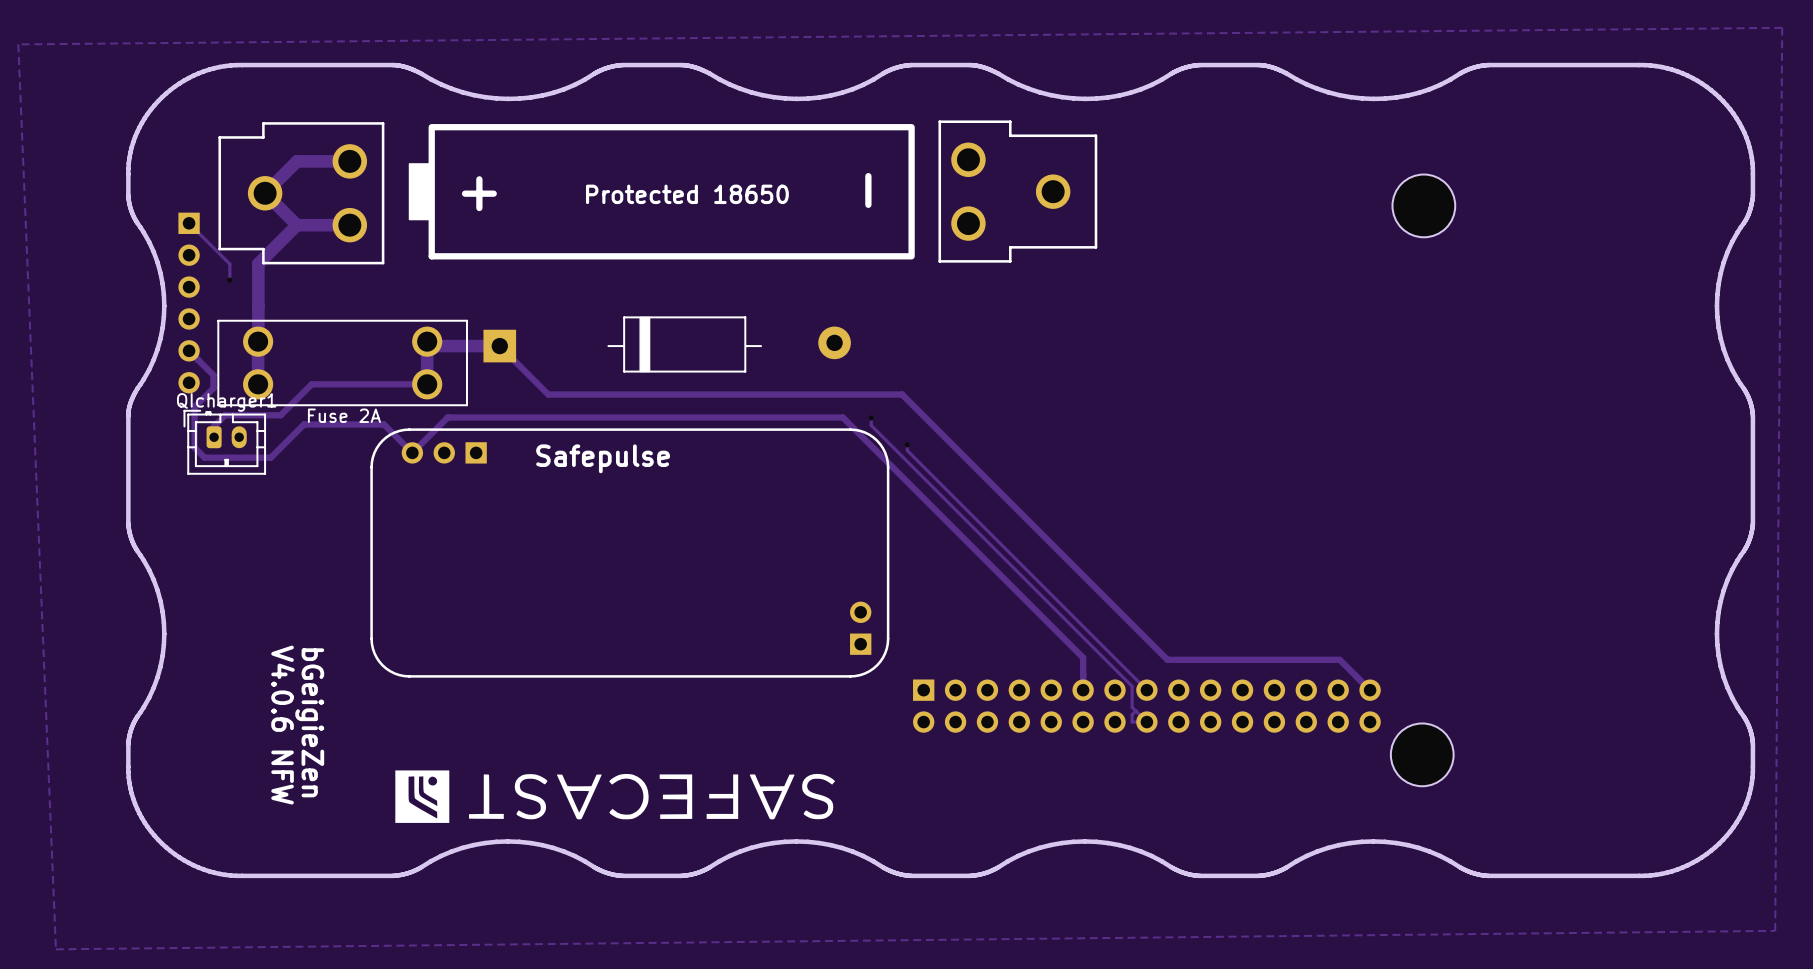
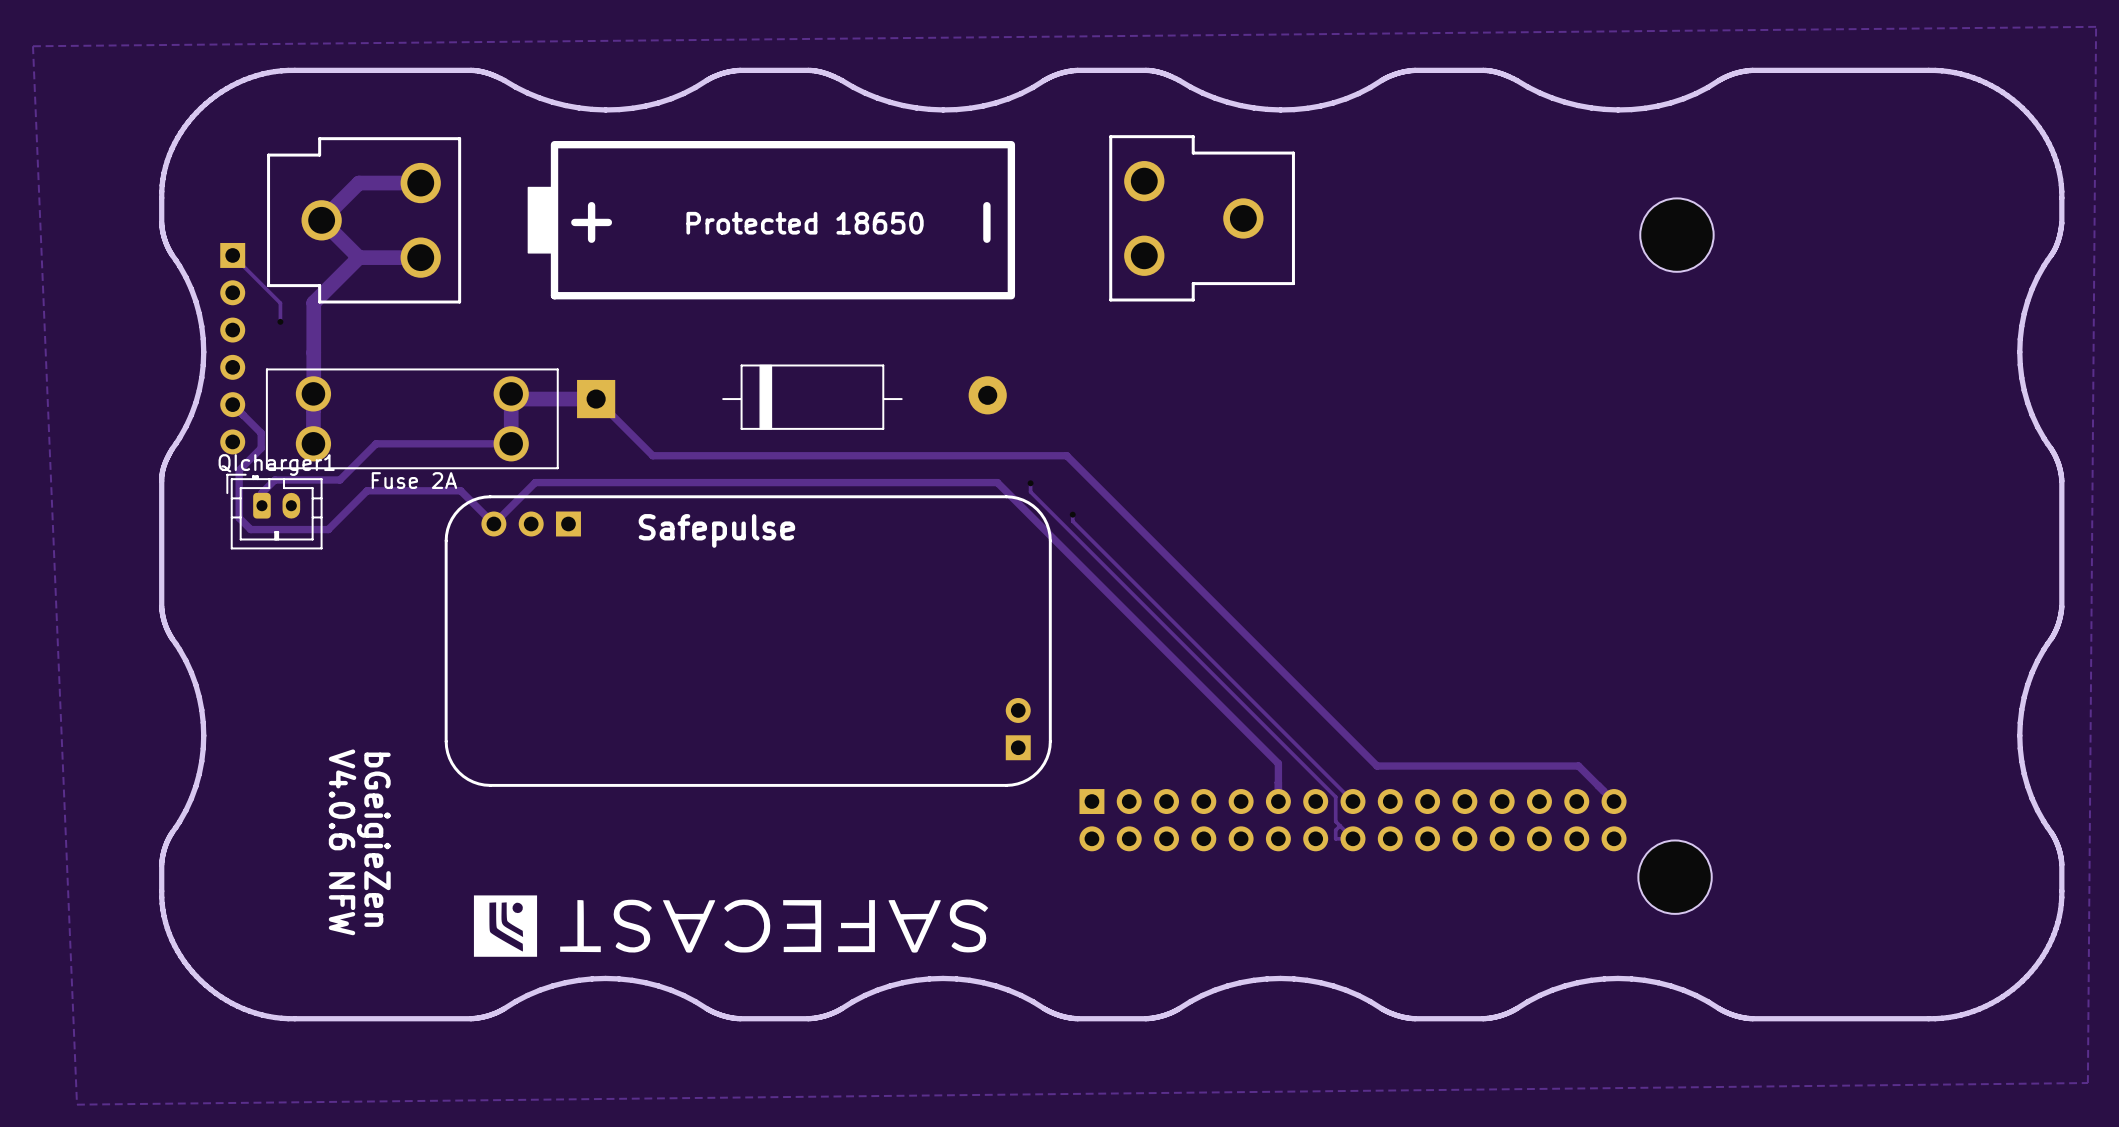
drawing shape: [408, 124, 915, 260] -> [527, 141, 1016, 300]

